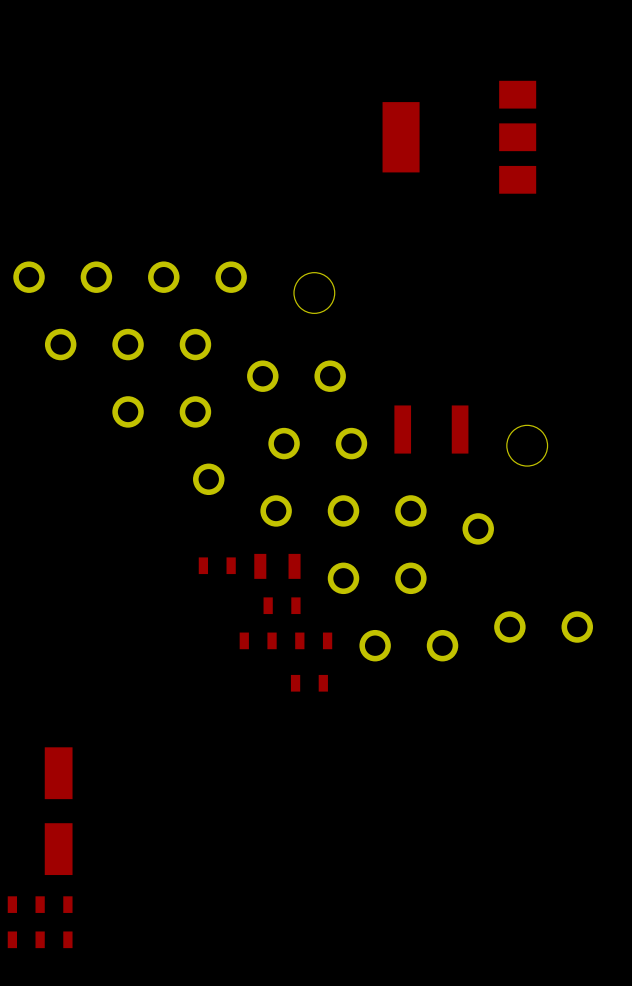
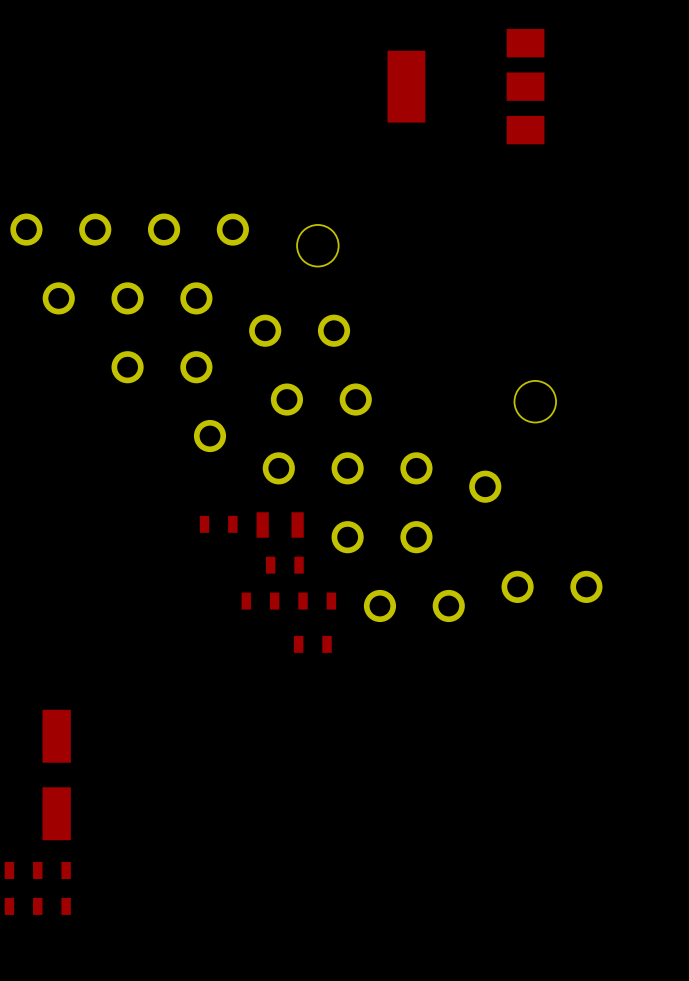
part: (431, 429) -> none

